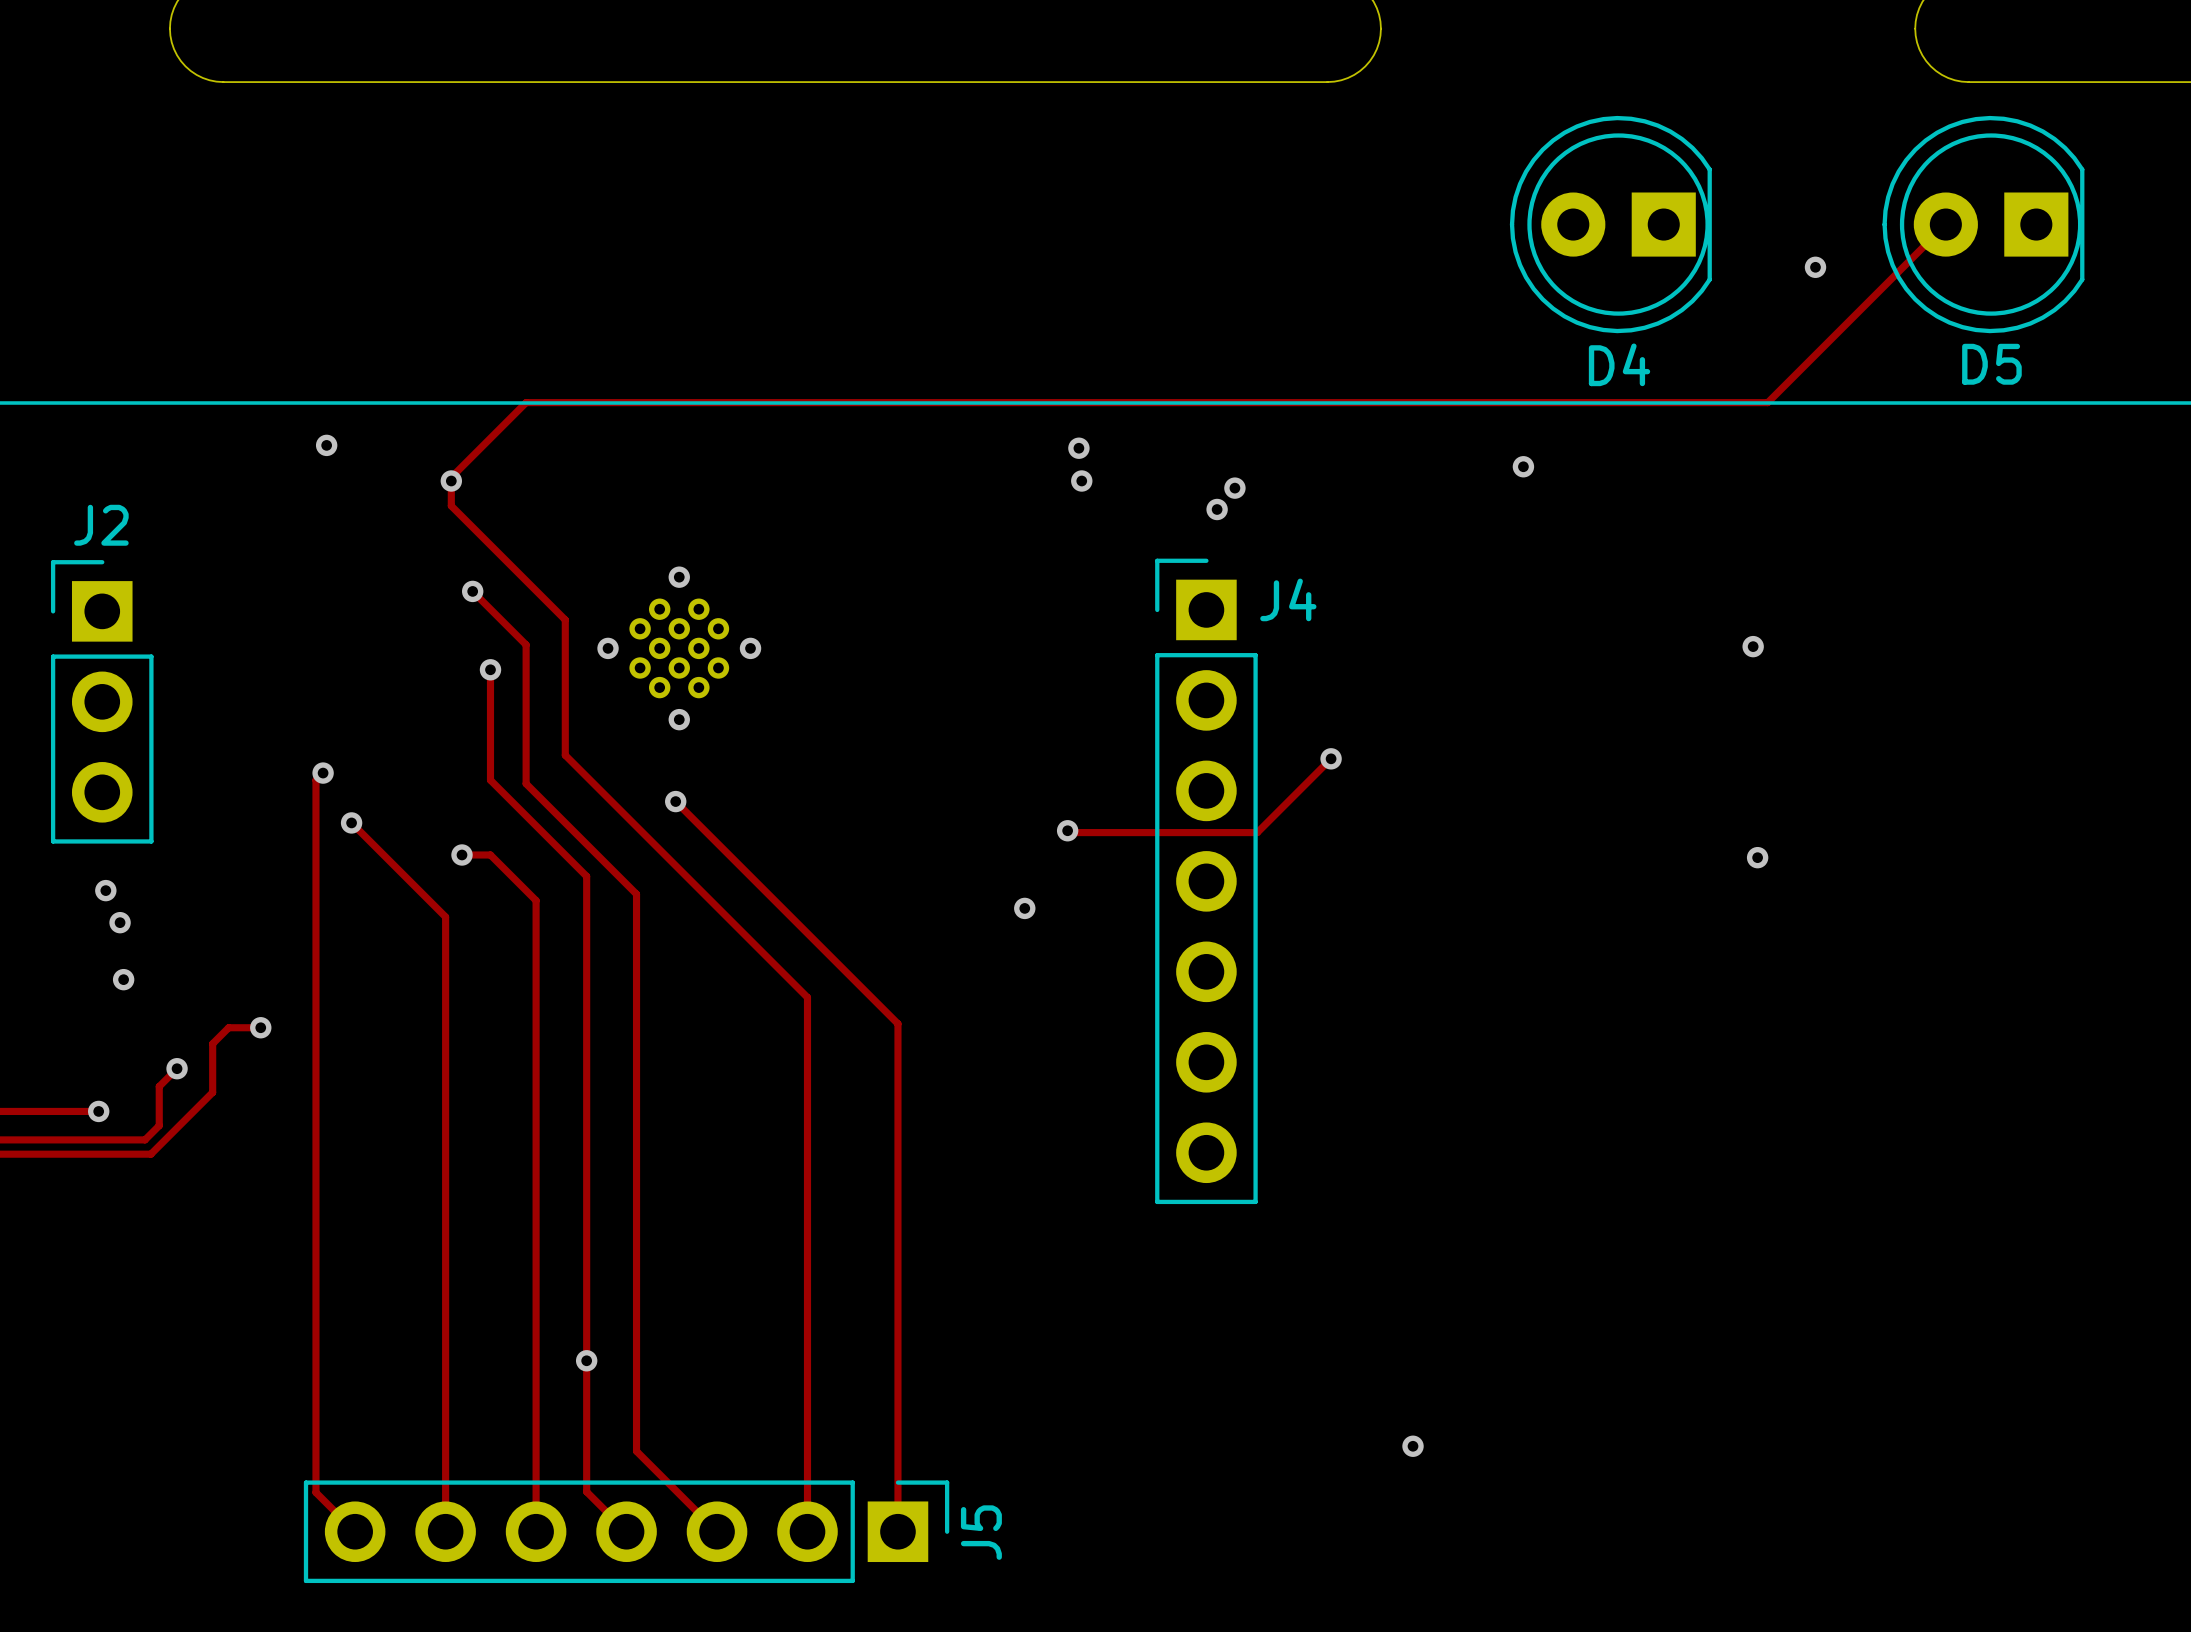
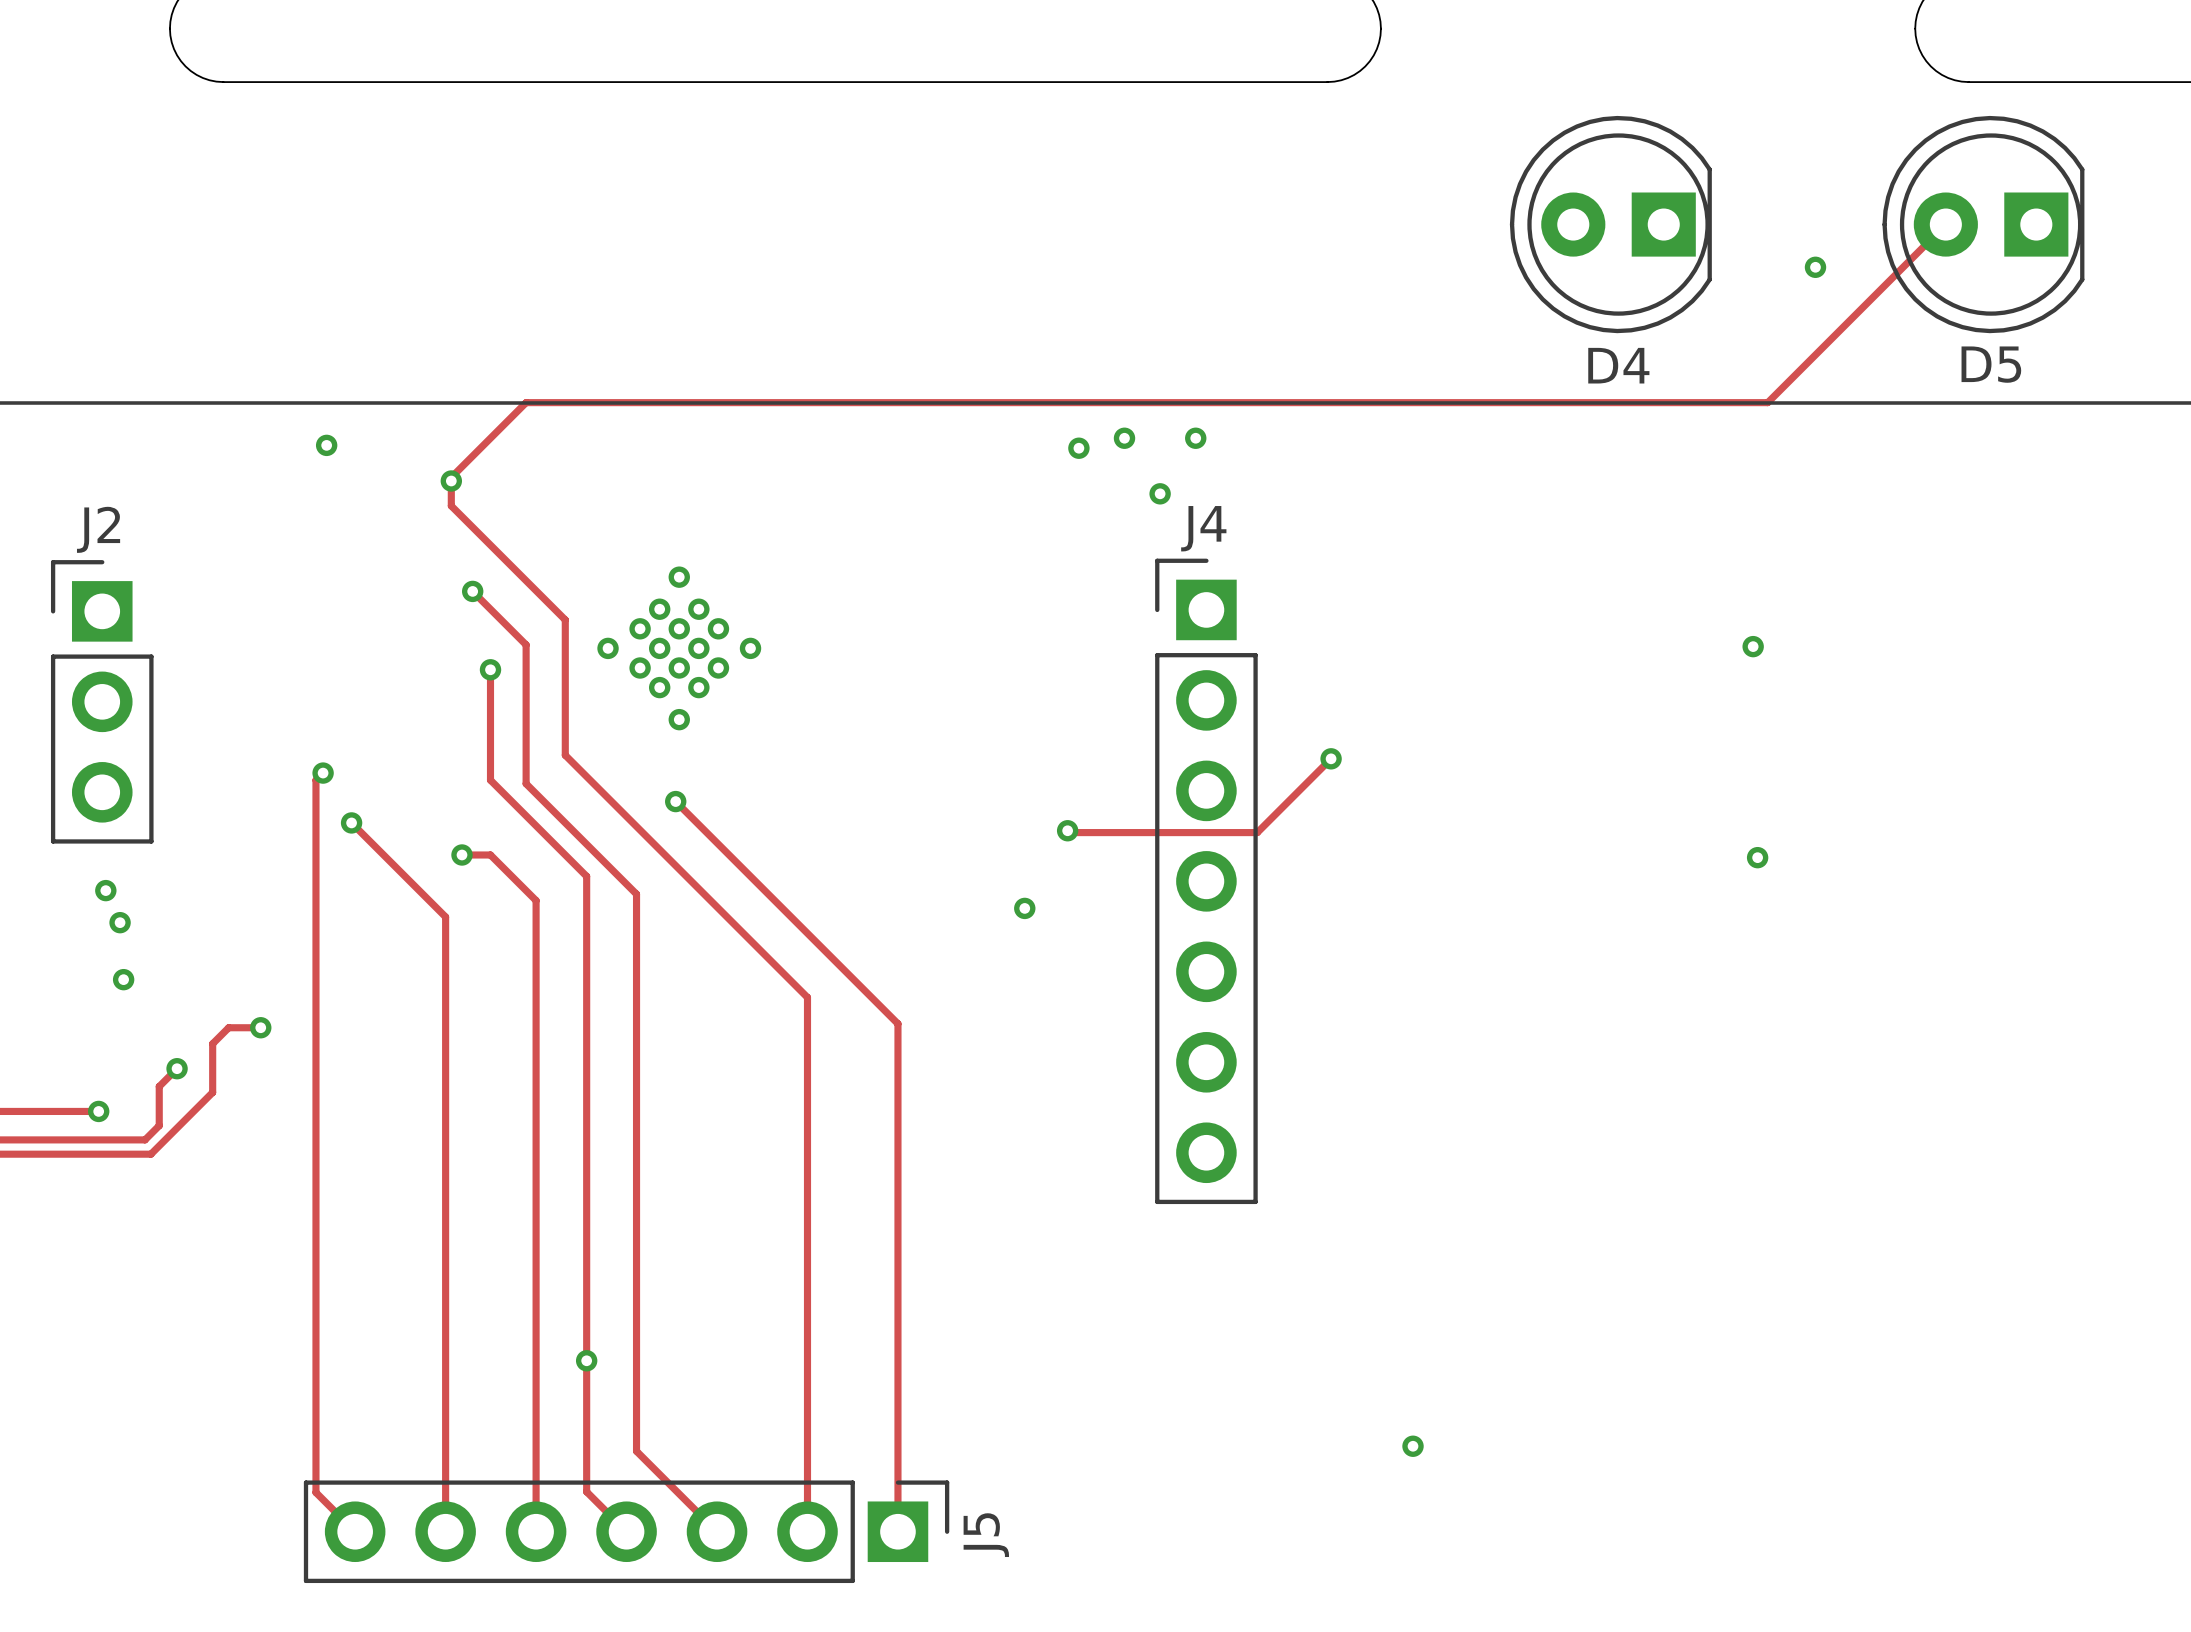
via: none -> (1124, 438)
via: none -> (1195, 438)
via: (1523, 466) -> none
via: (1081, 481) -> none
via: (1234, 488) -> none
via: none -> (1160, 493)
via: (1217, 509) -> none
J4 name position: J4 (1288, 599) -> J4 (1203, 528)

